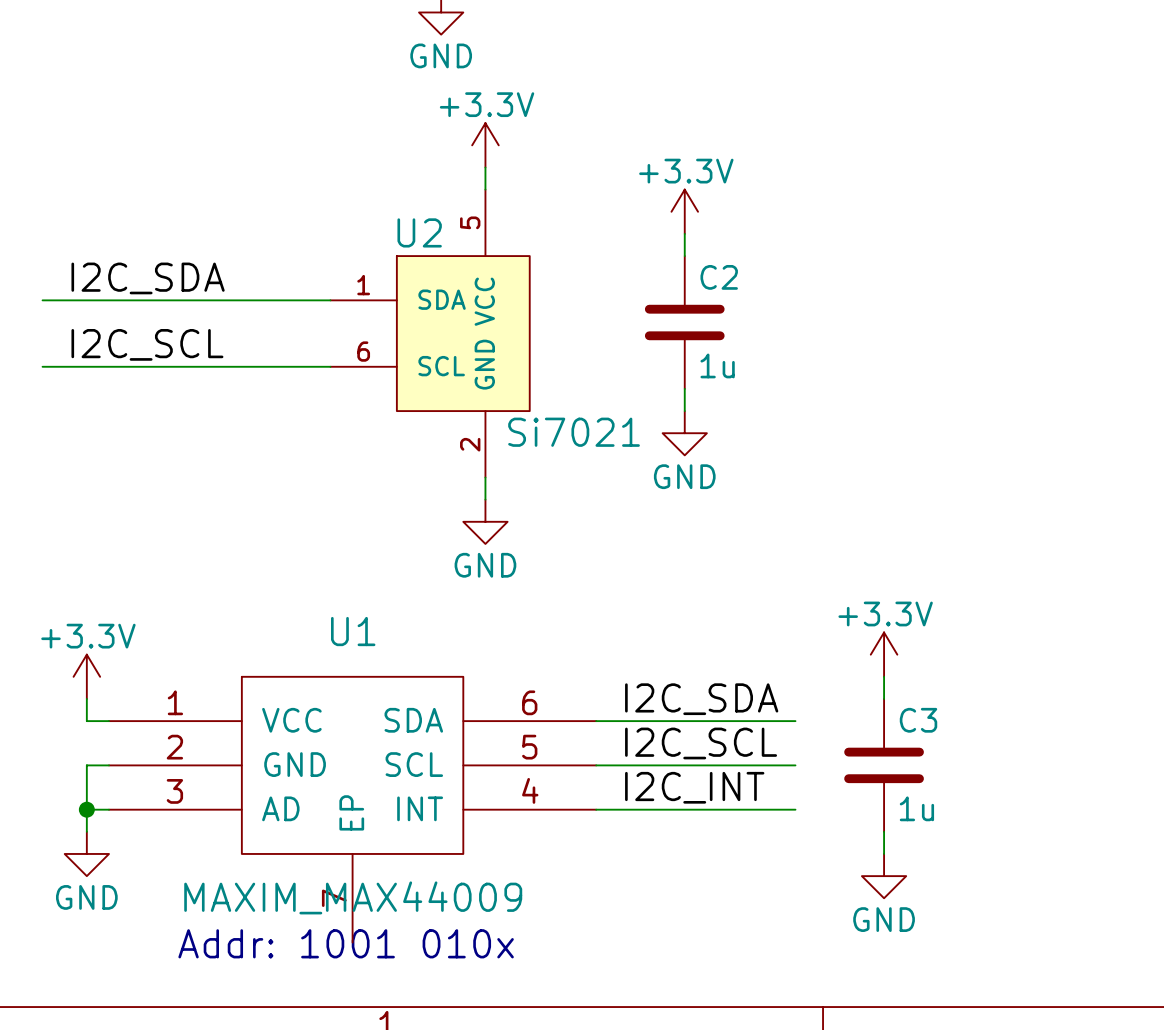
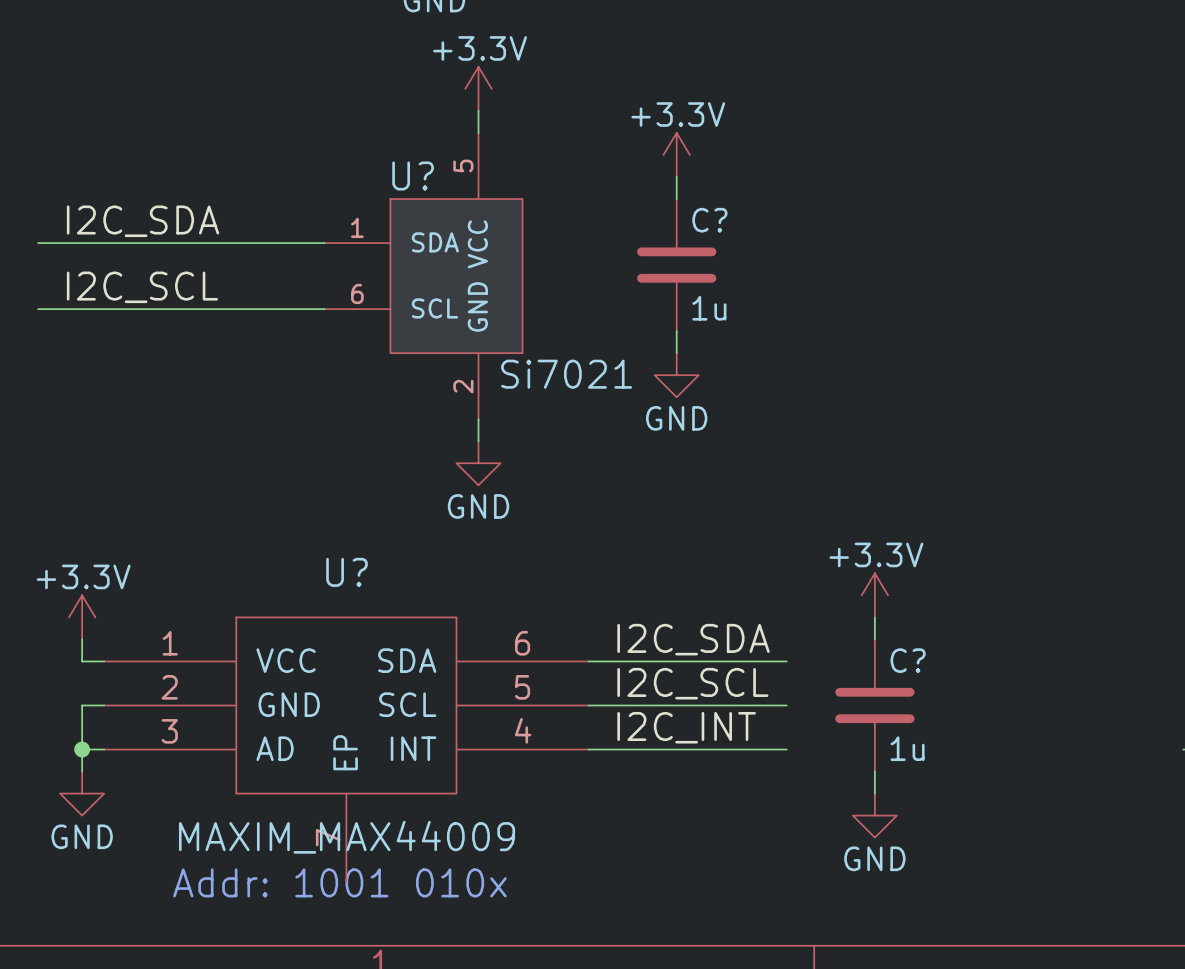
U2 name: U2 (419, 232) -> U? (413, 176)
C2 name: C2 (719, 277) -> C? (709, 220)
U1 name: U1 (353, 631) -> U? (347, 572)
C3 name: C3 (918, 720) -> C? (908, 660)

